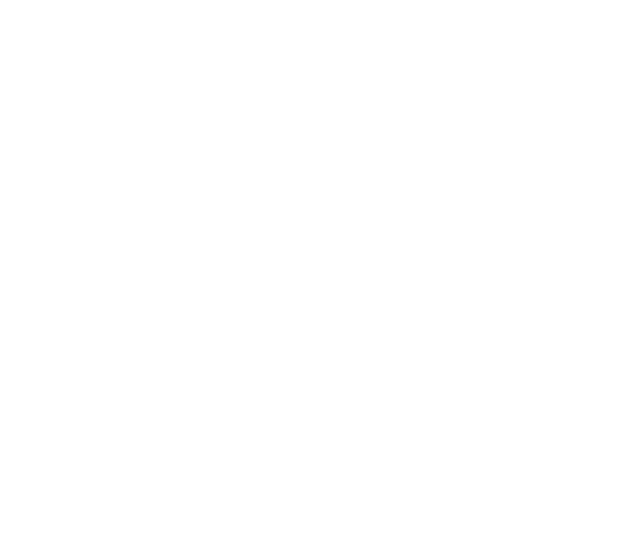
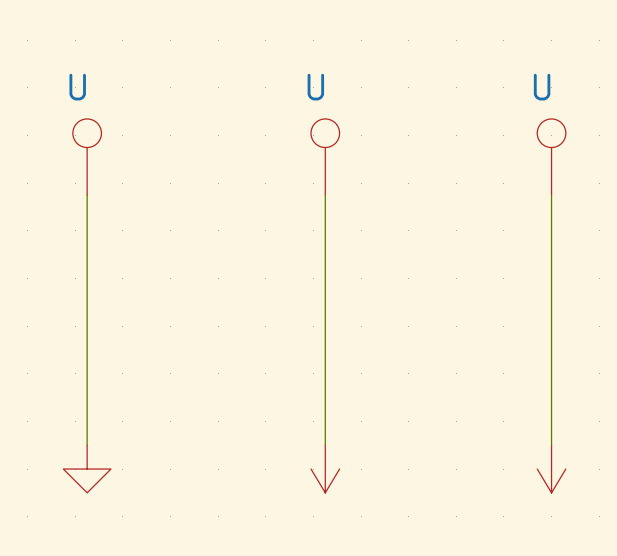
U: none -> (87, 157)
U: none -> (325, 157)
U: none -> (551, 157)
wire: none -> (87, 195) (87, 445)
wire: none -> (325, 195) (325, 445)
wire: none -> (551, 195) (551, 445)
power symbol: none -> (87, 469)
power symbol: none -> (325, 469)
power symbol: none -> (551, 469)

